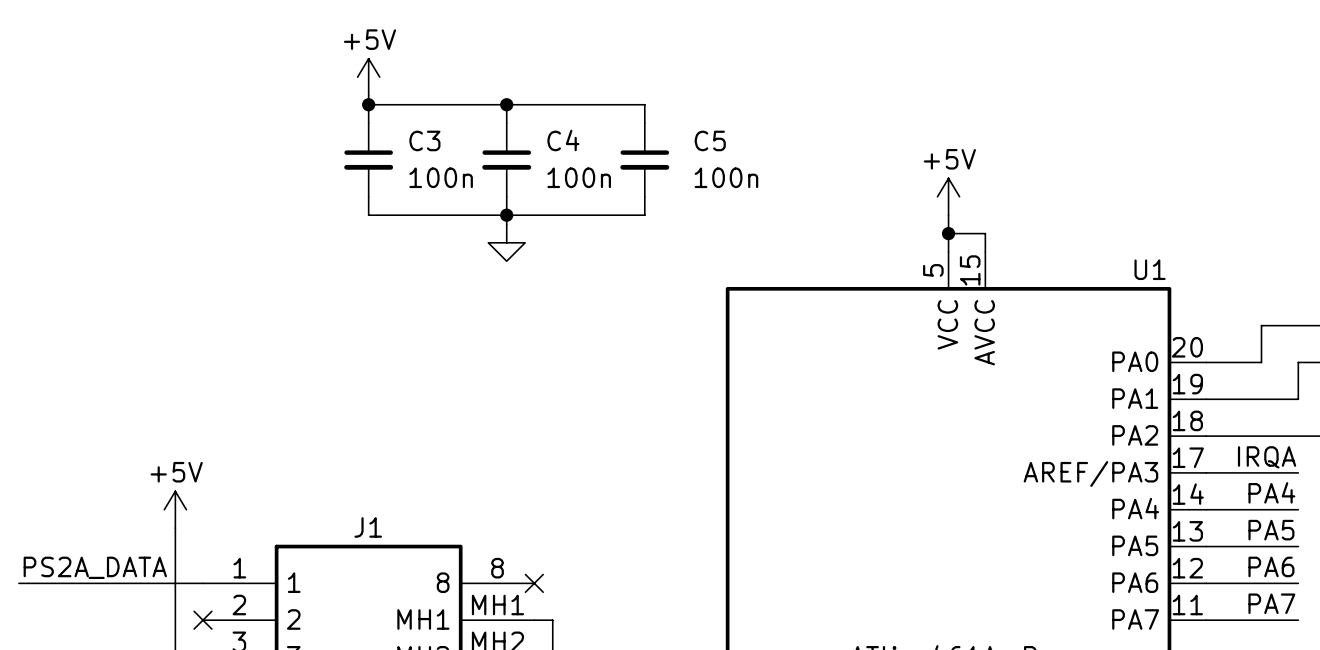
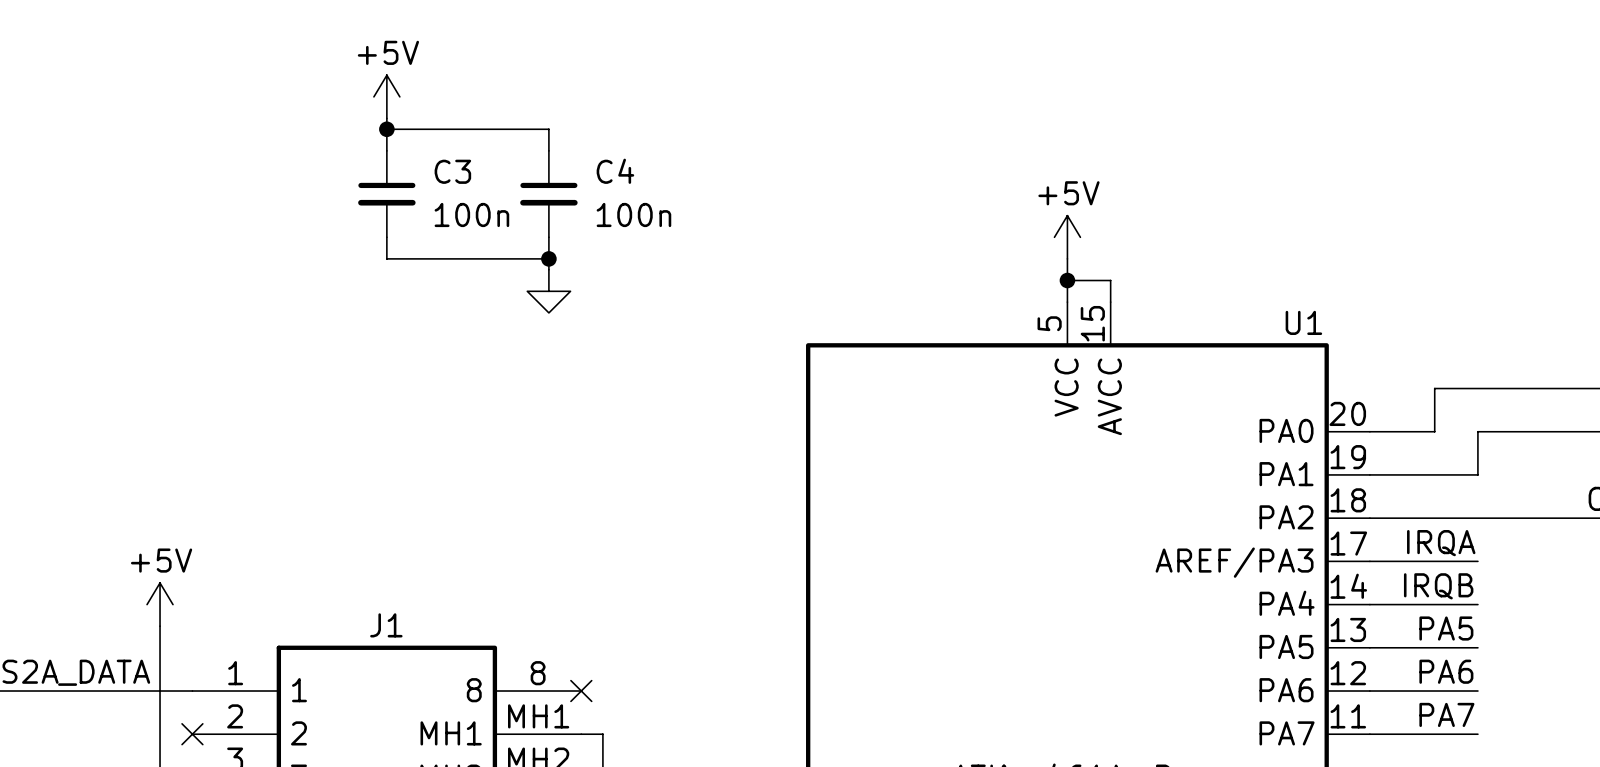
wire: (506, 104) (644, 104) (644, 123) -> none
junction: (506, 104) -> none
C5: 100n (644, 159) -> none
wire: (644, 196) (644, 215) (506, 215) -> none
label: PA4 (1271, 492) -> IRQB (1438, 586)

